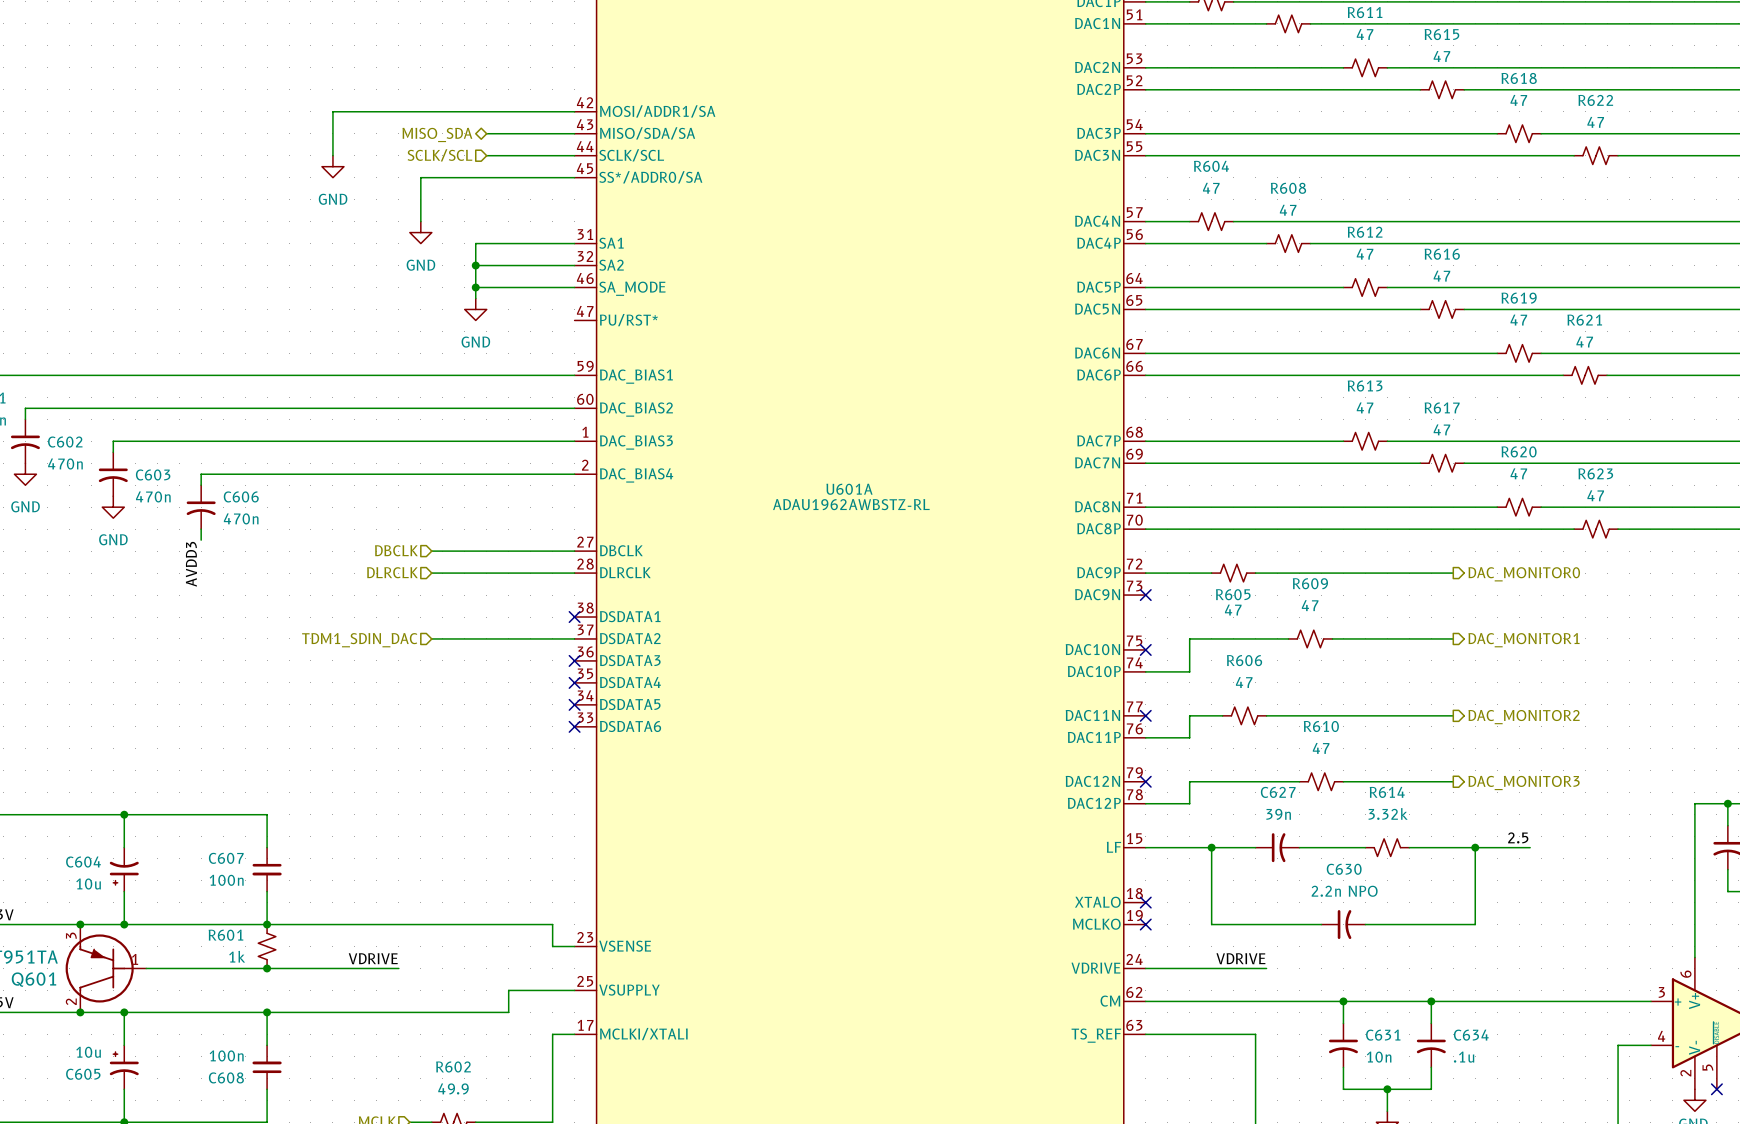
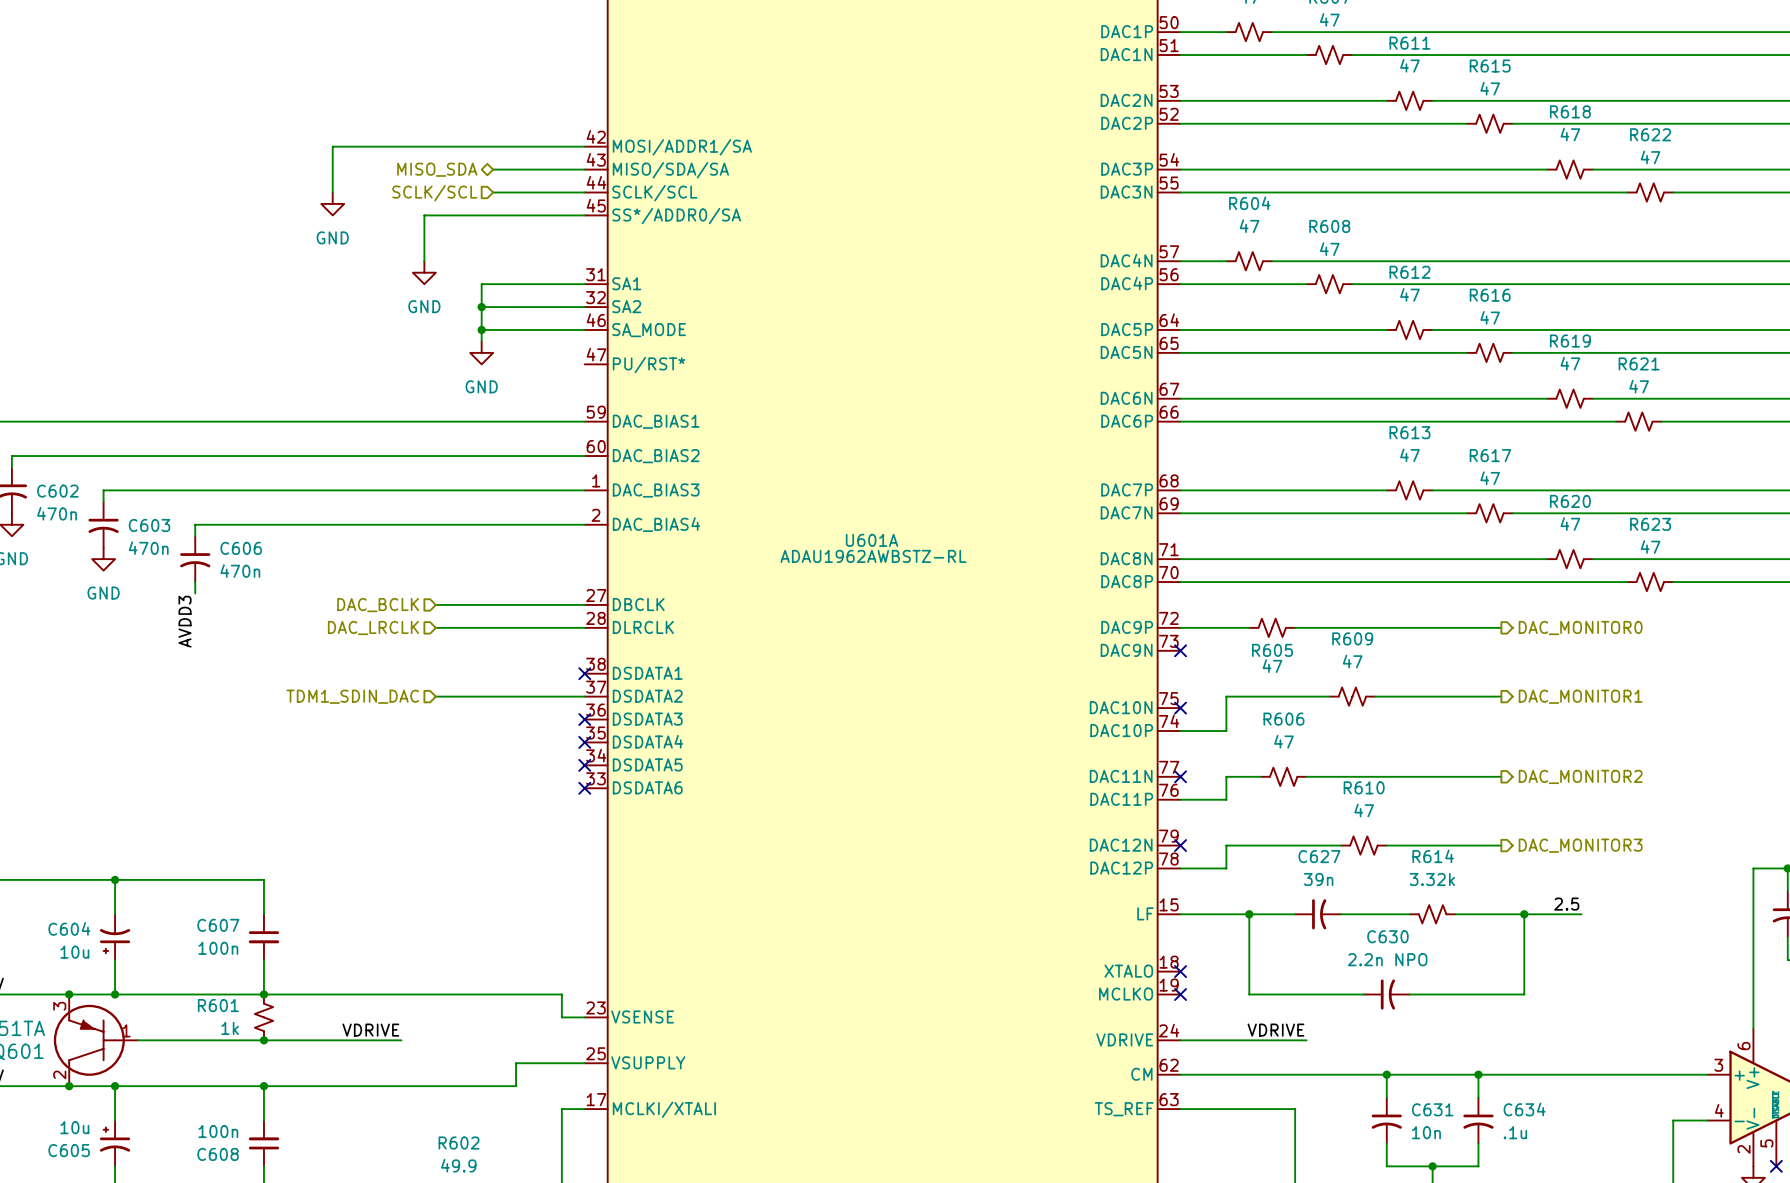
hierarchical label: DBCLK (396, 550) -> DAC_BCLK (378, 605)
hierarchical label: DLRCLK (392, 572) -> DAC_LRCLK (373, 627)

